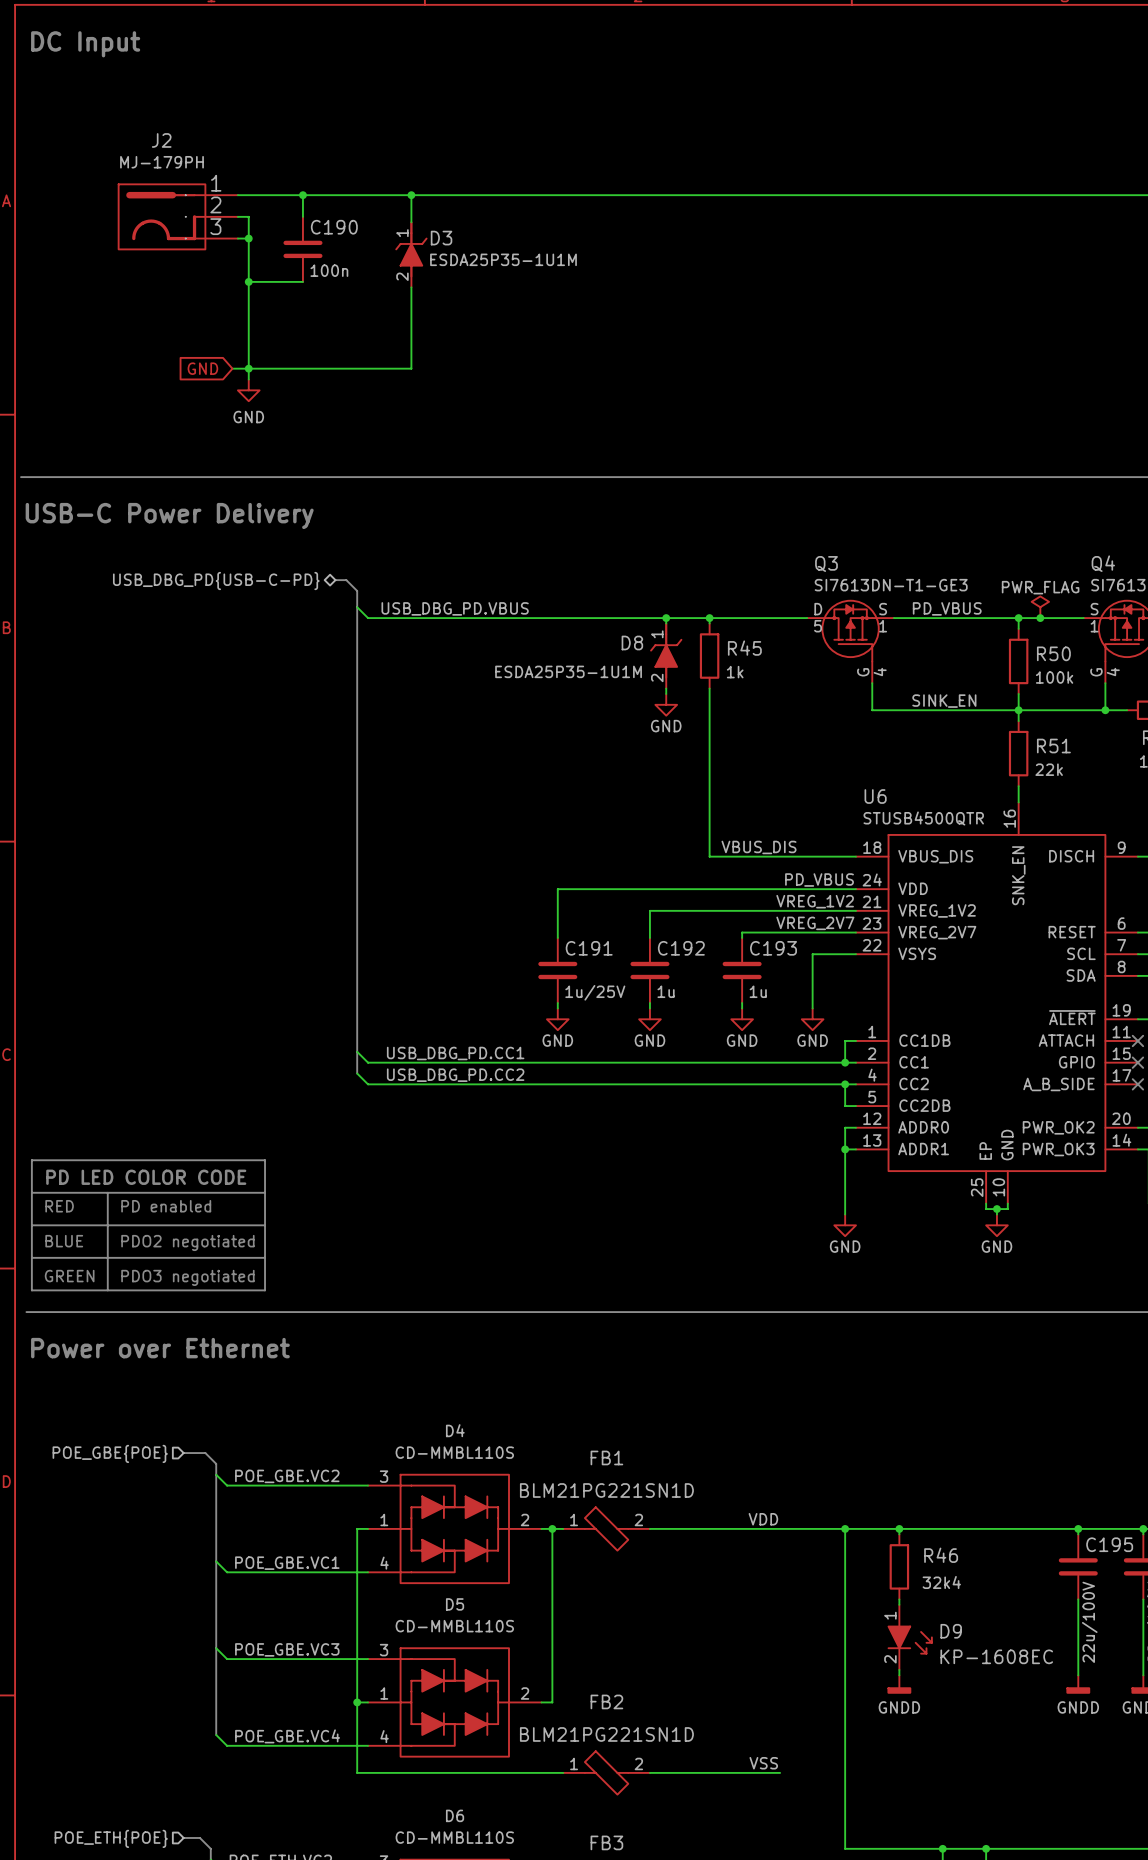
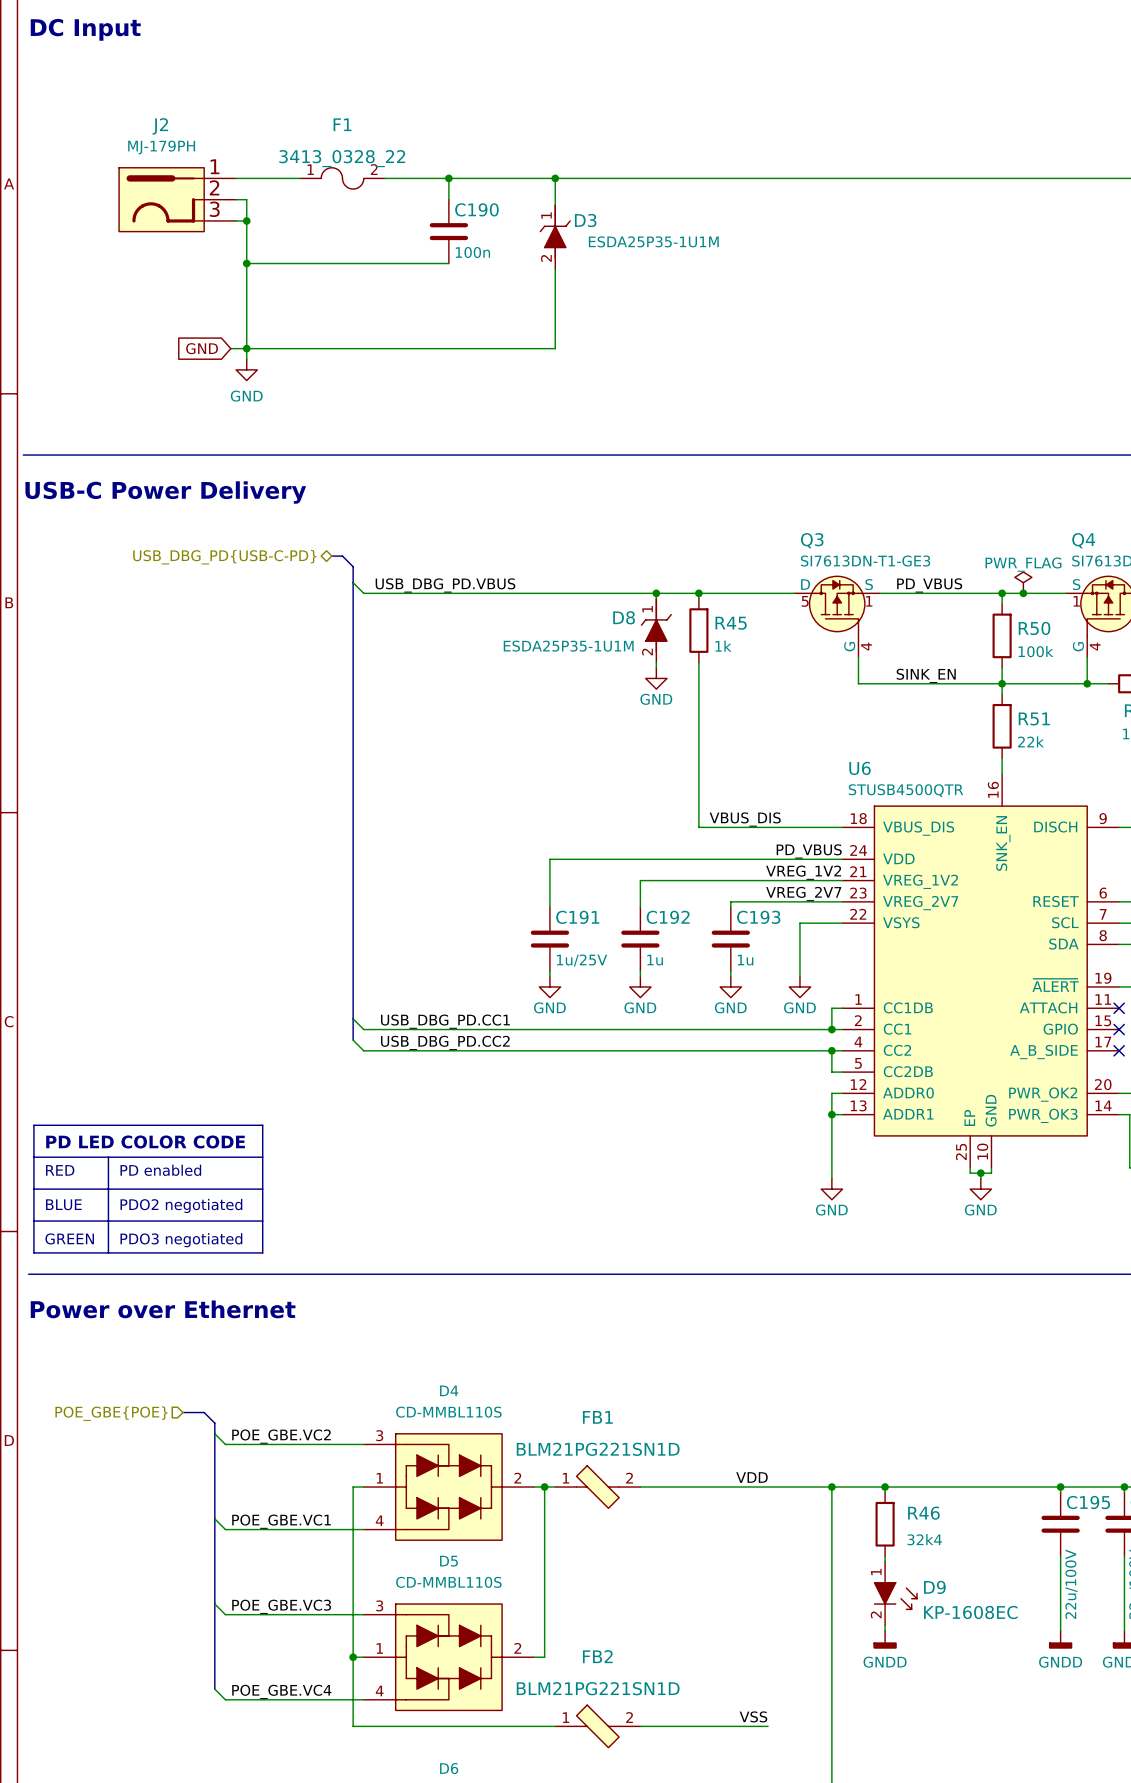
junction: (302, 195) -> none
F1: none -> 3413_0328_22 (342, 178)
wire: (389, 195) (302, 195) (302, 216) -> none
wire: (411, 195) (411, 222) -> (555, 178) (555, 205)
junction position: (411, 195) -> (448, 178)
wire: none -> (448, 178) (448, 199)
junction: none -> (555, 178)
C190 position: (302, 249) -> (448, 231)
D3 position: (411, 254) -> (555, 236)
wire: none -> (299, 263) (448, 263)
wire: (411, 287) (411, 368) -> (555, 268) (555, 348) (406, 348)

